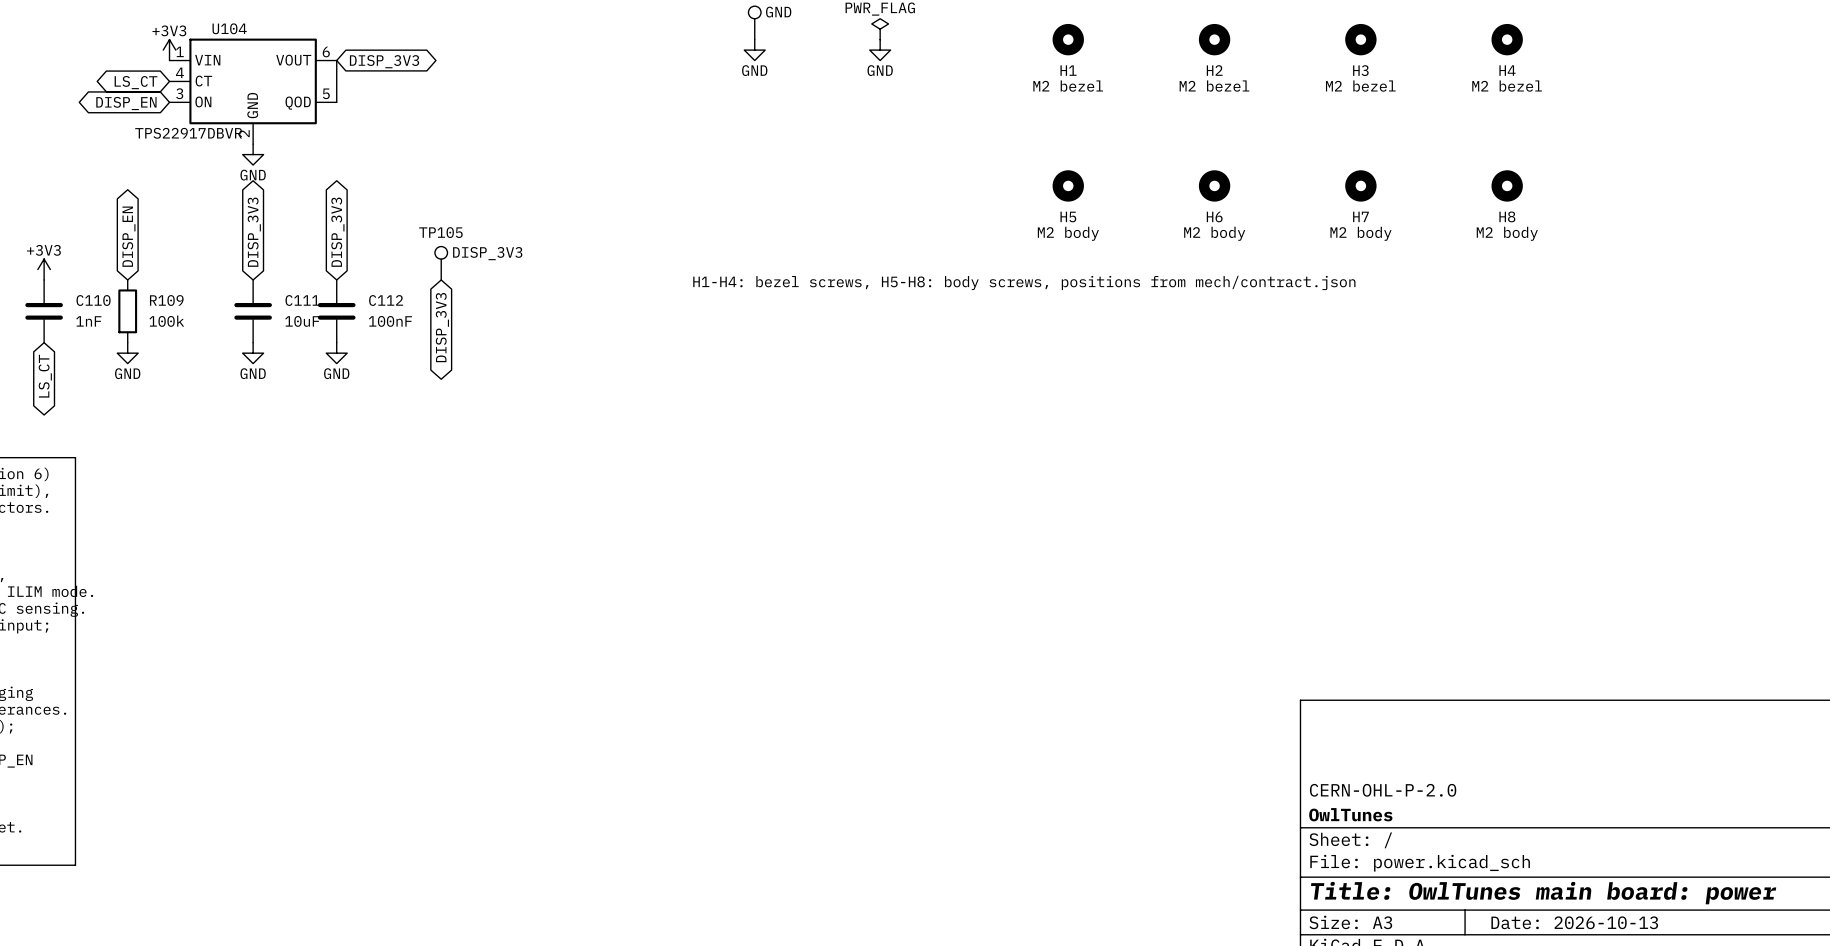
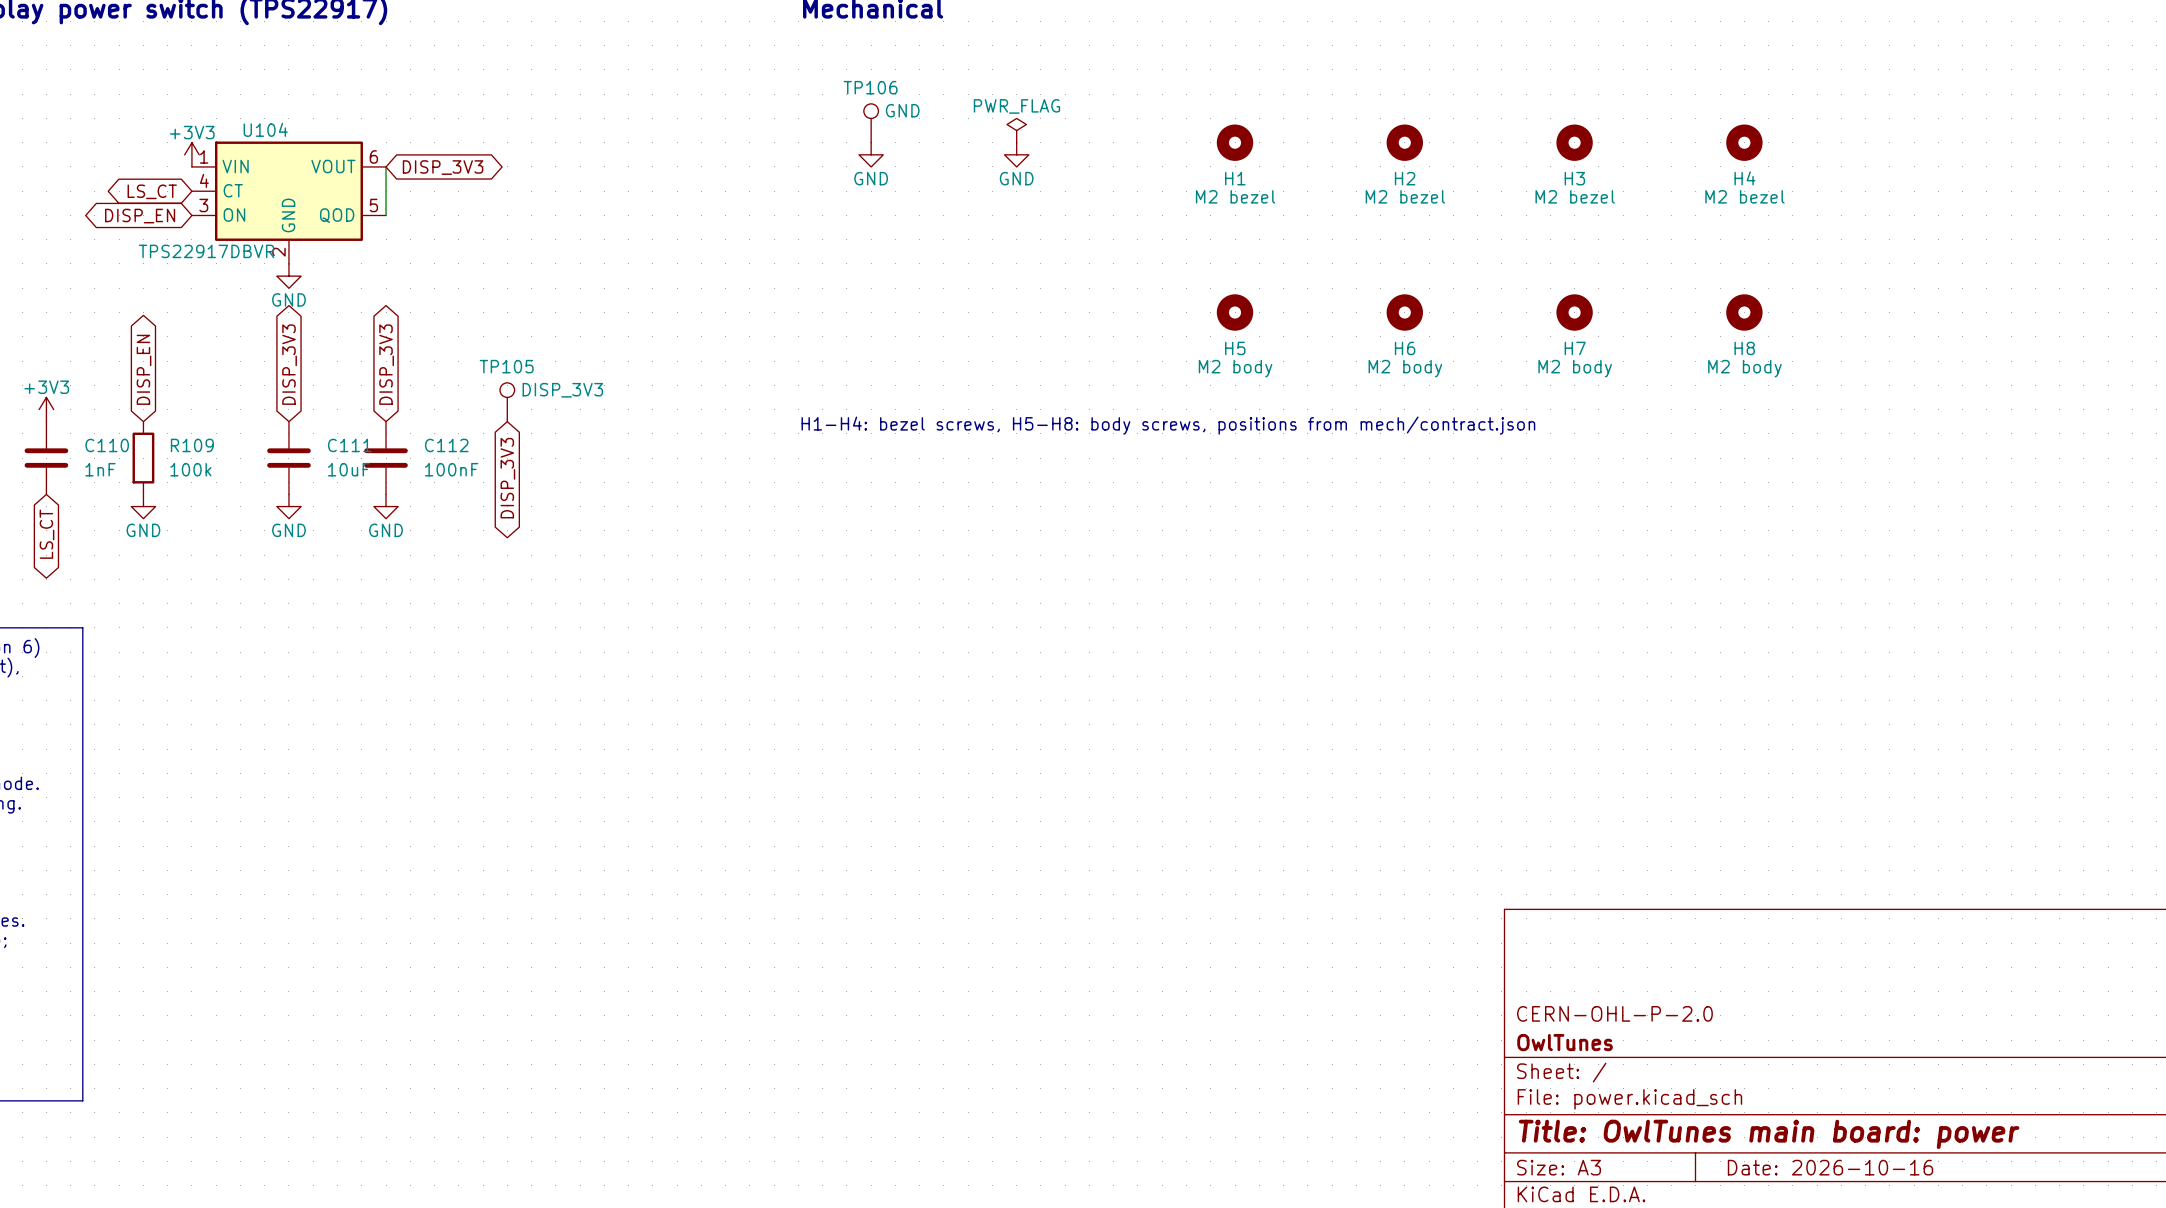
title block: Date: 2026-10-13 (1574, 922) -> Date: 2026-10-16 (1830, 1167)

